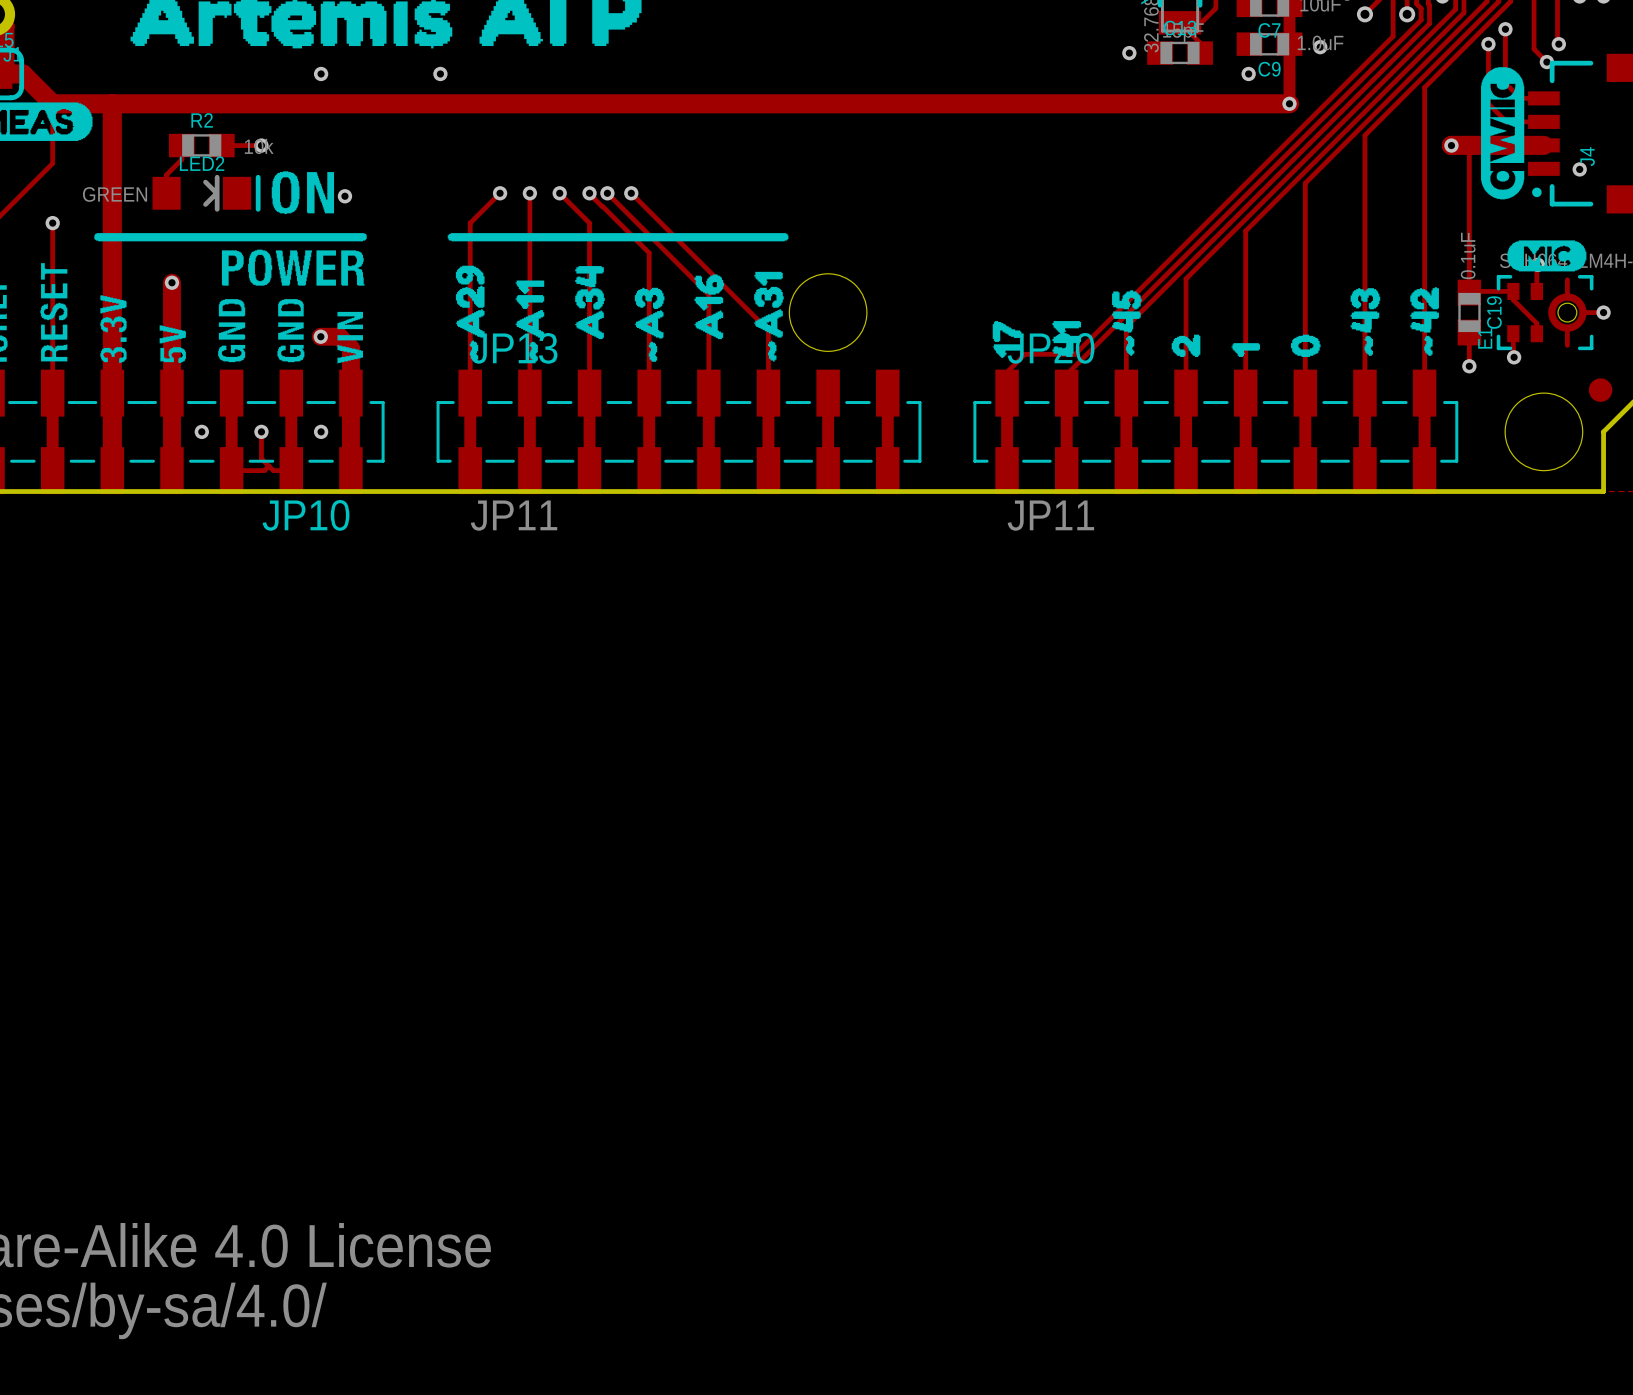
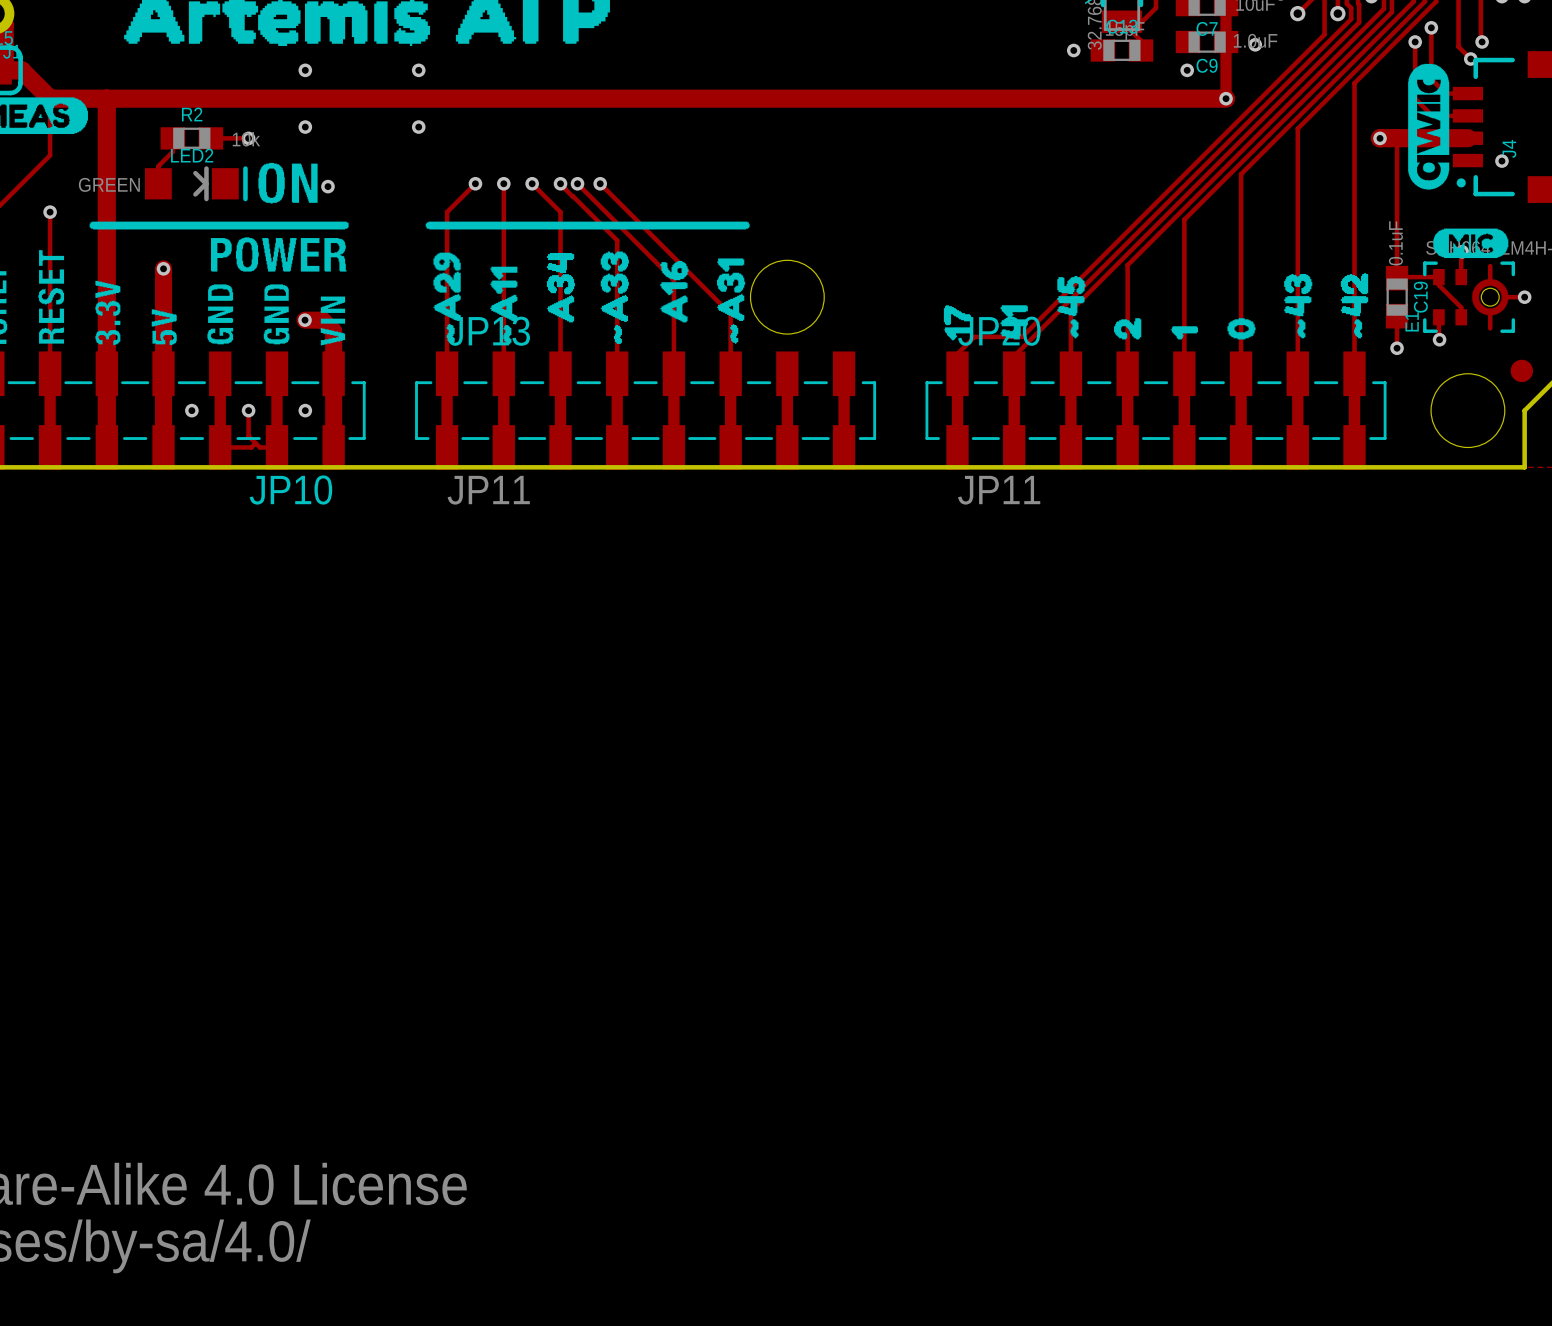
via: none -> (305, 127)
via: none -> (418, 127)
drawing shape: [634, 287, 665, 362] -> [600, 251, 629, 344]

